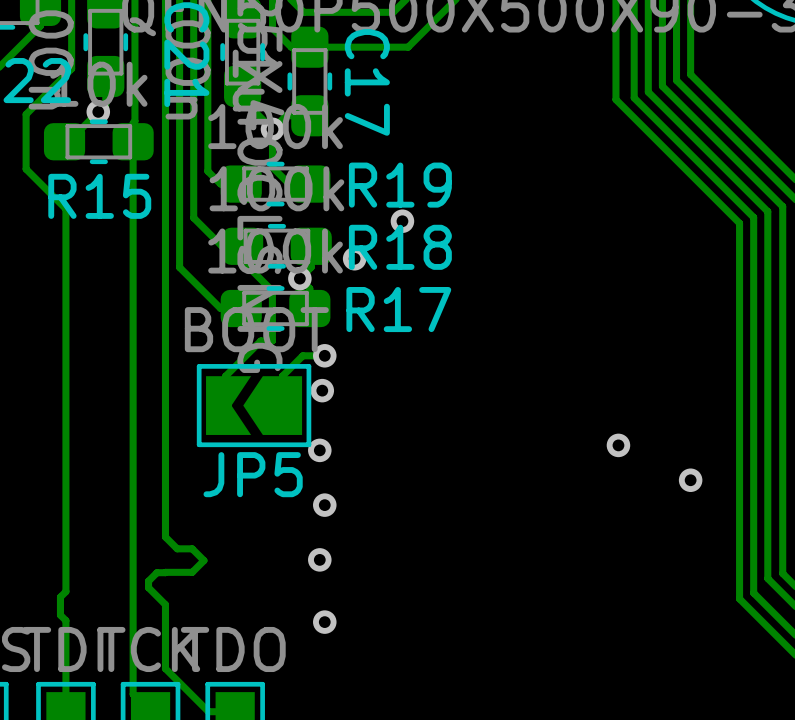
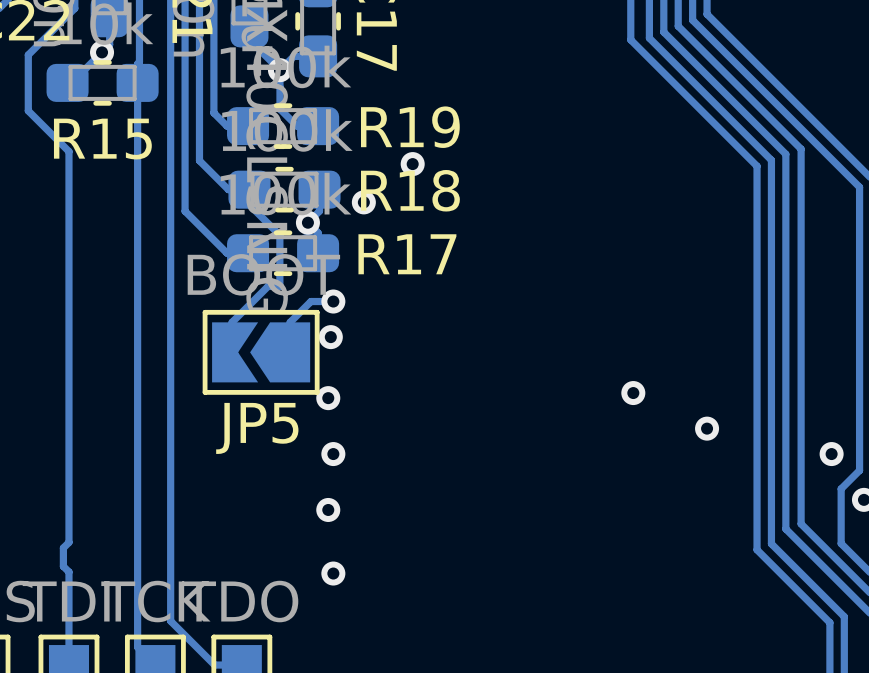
track: (165, 537) (177, 548) (192, 548) (203, 560) (192, 572) (165, 572) -> (170, 486) (170, 555)
track: (165, 572) (157, 572) (148, 581) (148, 587) (165, 604) -> none

